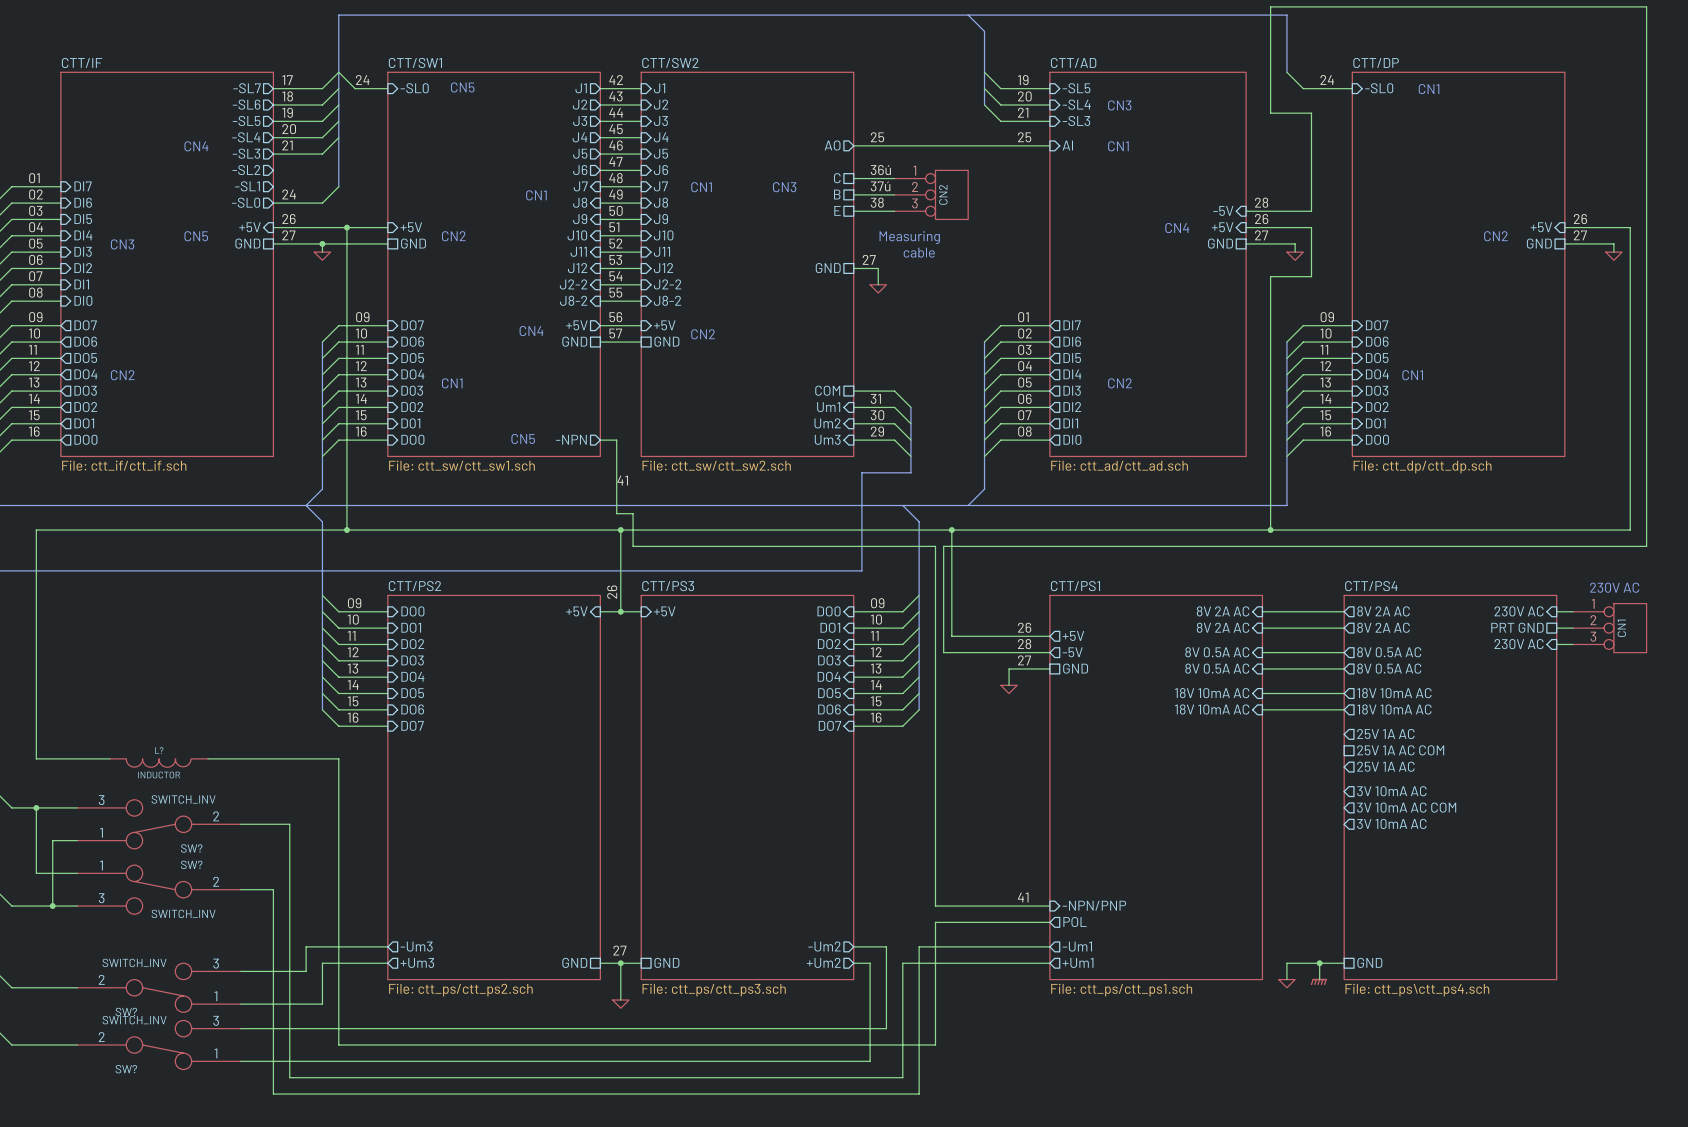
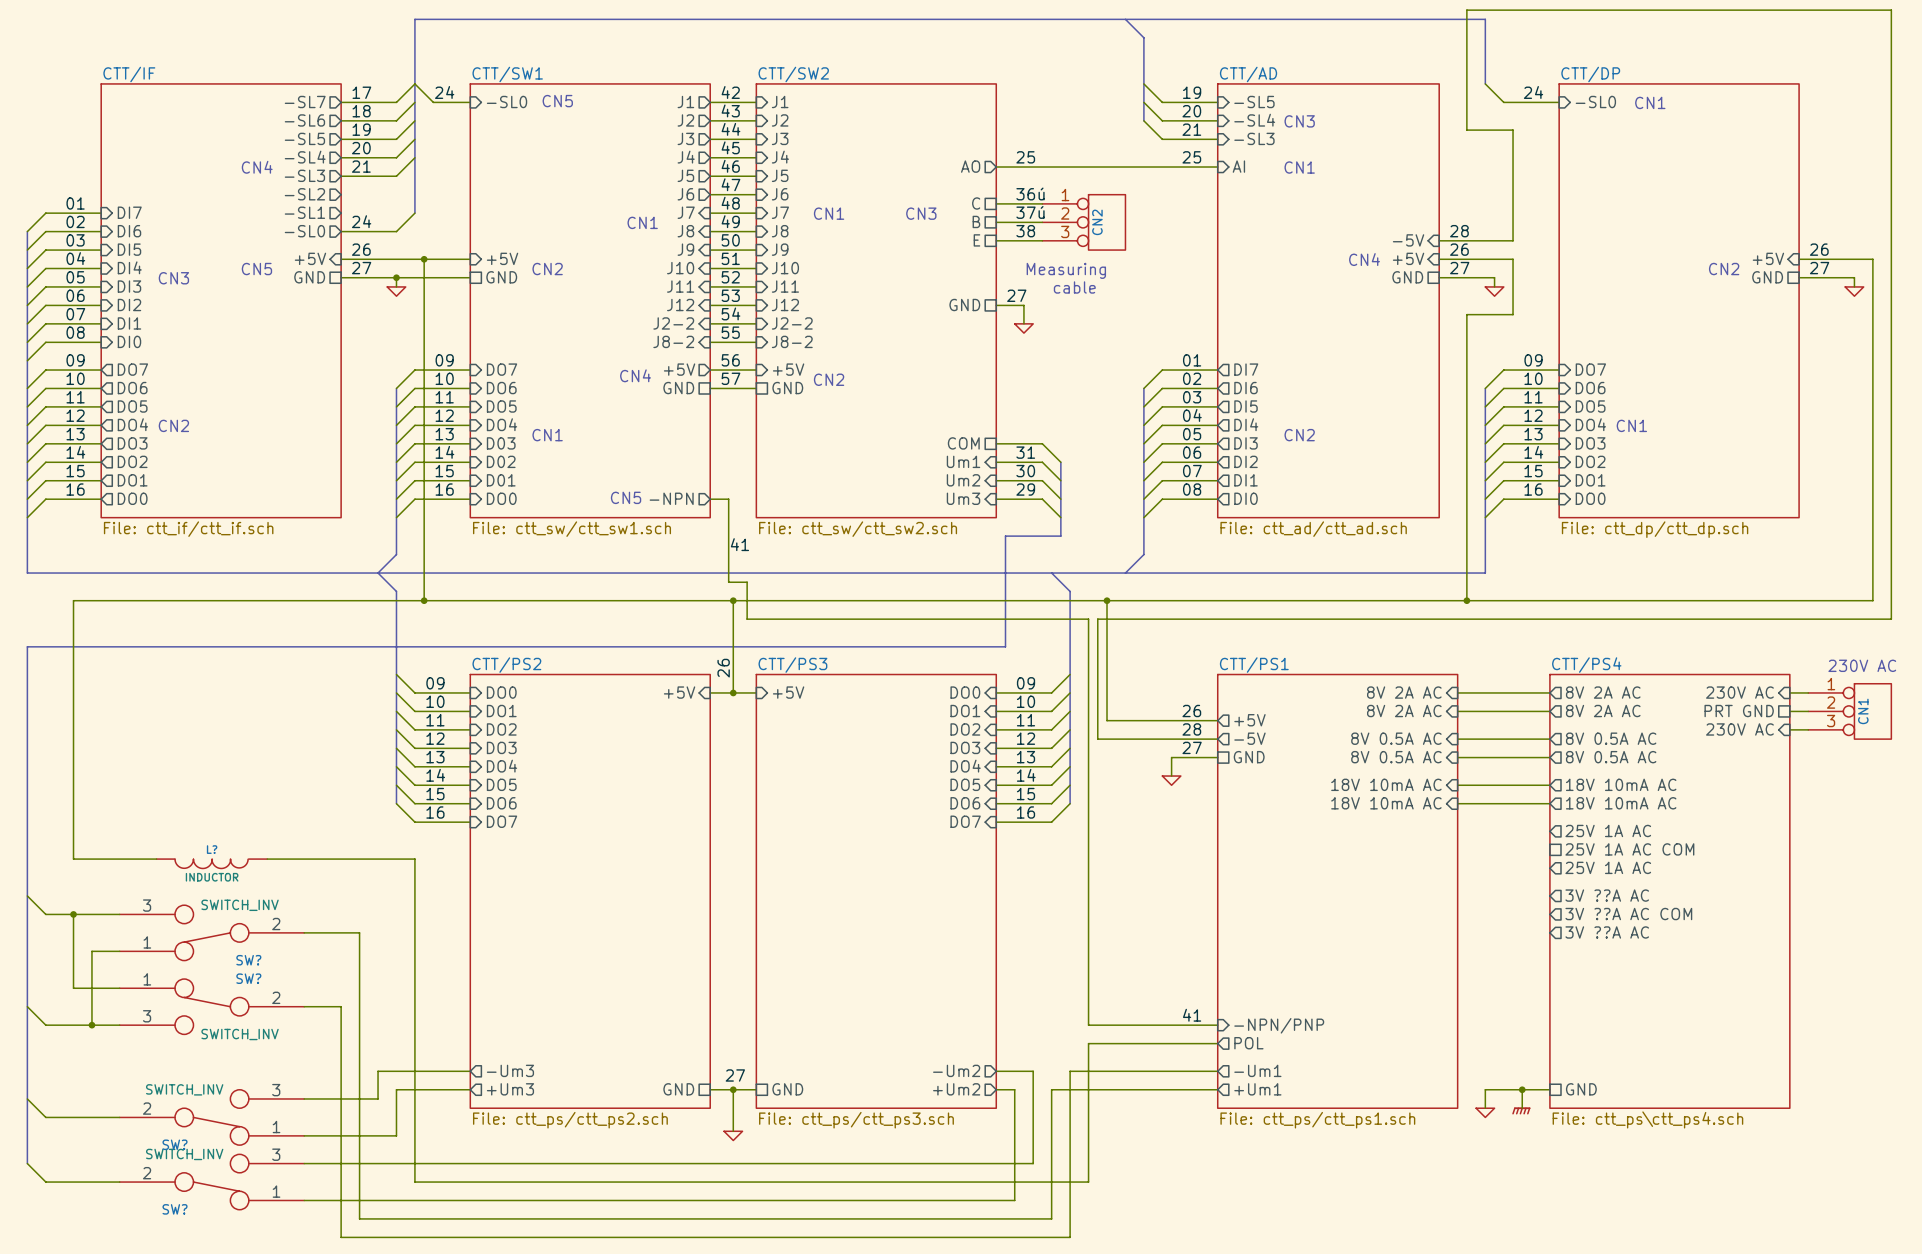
sheet pin: 3V 10mA AC (1391, 791) -> 3V ??A AC (1607, 895)
sheet pin: 3V 10mA AC COM (1406, 807) -> 3V ??A AC COM (1628, 914)
sheet pin: 3V 10mA AC (1391, 823) -> 3V ??A AC (1607, 932)

